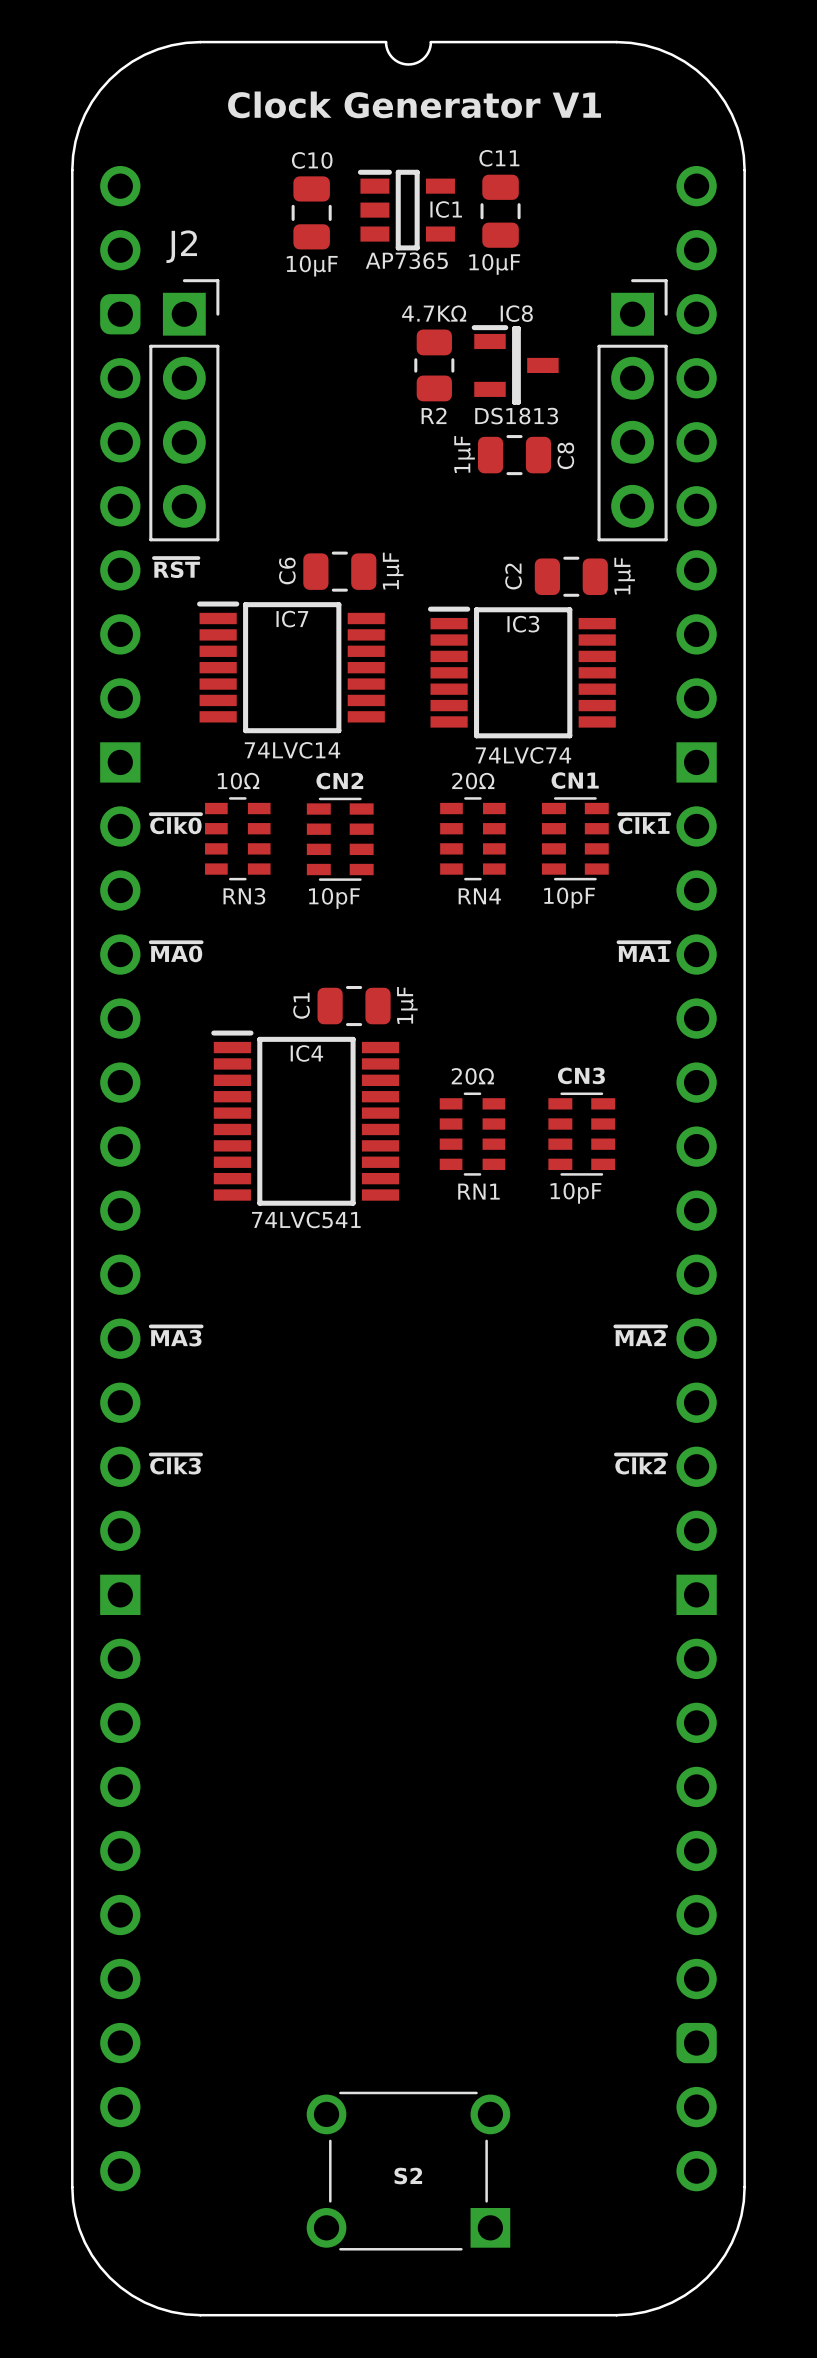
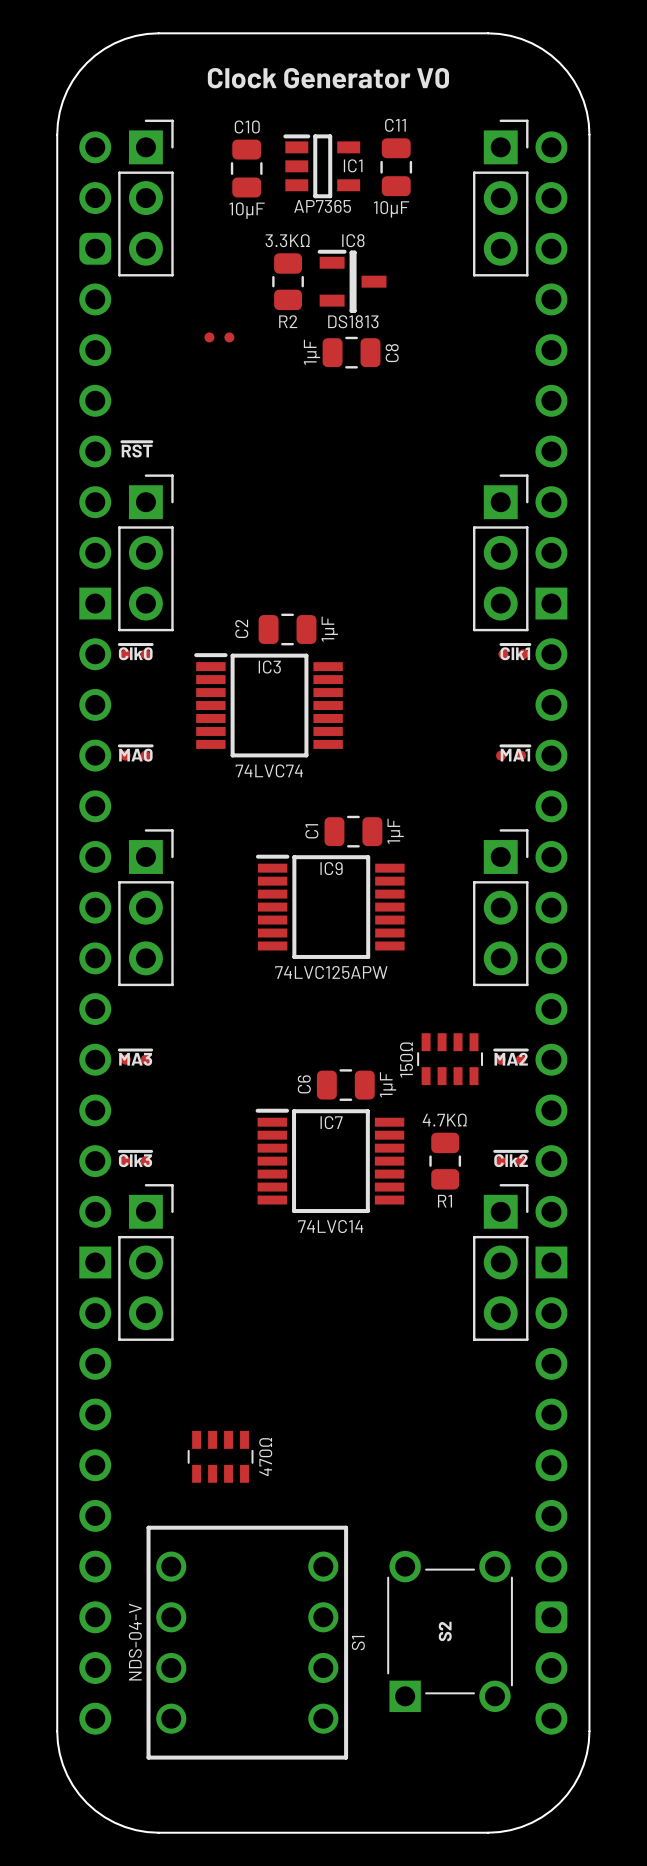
part footprint: [71, 40, 746, 2317] -> [56, 32, 591, 1834]
text: Clock Generator V1 (414, 104) -> Clock Generator V0 (328, 78)
part: none -> (145, 198)
part: none -> (500, 198)
R2 value: 4.7KΩ (434, 313) -> 3.3KΩ (287, 240)
IC8 position: (515, 364) -> (352, 281)
R2 position: (434, 365) -> (288, 281)
J2: (184, 410) -> none
part: (632, 410) -> none
part: none -> (219, 337)
C8 position: (514, 455) -> (351, 352)
C6 position: (339, 571) -> (345, 1085)
C2 position: (571, 576) -> (287, 629)
IC7 position: (290, 667) -> (329, 1160)
IC3 position: (521, 672) -> (268, 705)
part: none -> (145, 552)
part: none -> (500, 552)
part: none -> (135, 654)
part: none -> (513, 654)
RN3: (237, 838) -> none
RN4: (472, 838) -> none
CN1: (575, 838) -> none
CN2: (340, 839) -> none
part: none -> (135, 755)
part: none -> (511, 755)
C1 position: (354, 1006) -> (353, 831)
IC4: (305, 1118) -> none
RN1: (472, 1134) -> none
CN3: (581, 1134) -> none
IC9: none -> (330, 906)
part: none -> (145, 907)
part: none -> (500, 907)
part: none -> (450, 1059)
part: none -> (135, 1059)
part: none -> (510, 1059)
part: none -> (135, 1161)
R1: none -> 4.7KΩ (445, 1161)
part: none -> (510, 1161)
part: none -> (145, 1262)
part: none -> (500, 1262)
part: none -> (220, 1456)
S1: none -> NDS-04-V (247, 1642)
S2 rotation: 0° (408, 2171) -> 90° clockwise (450, 1631)
S2 position: (408, 2171) -> (450, 1631)

